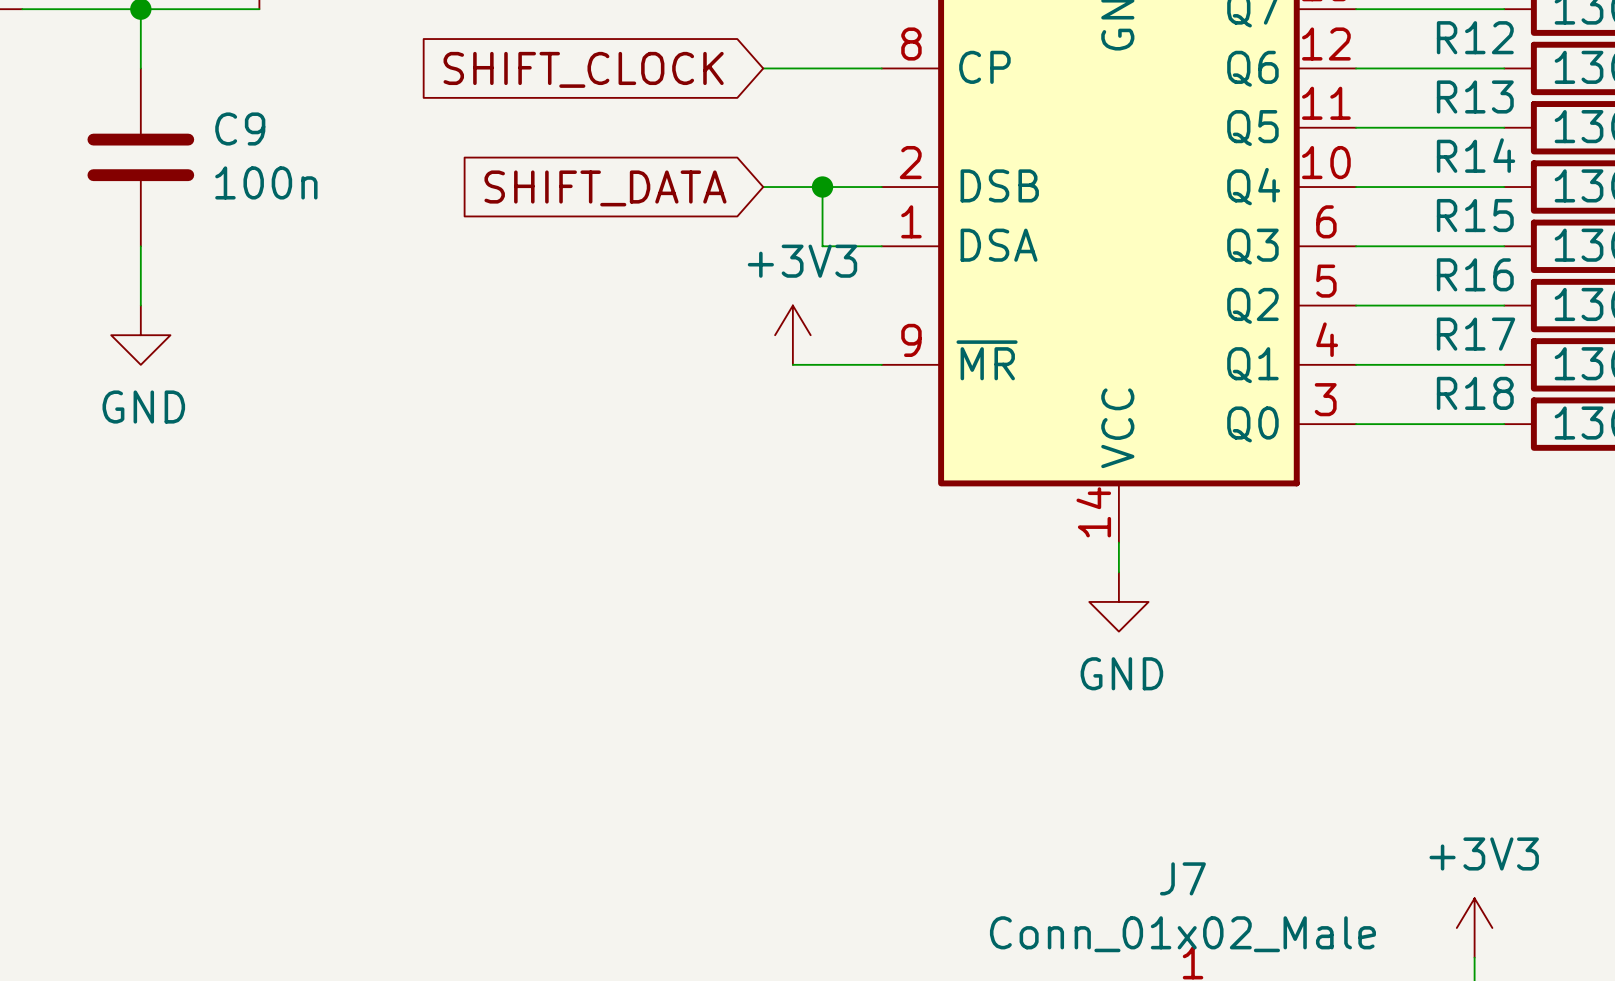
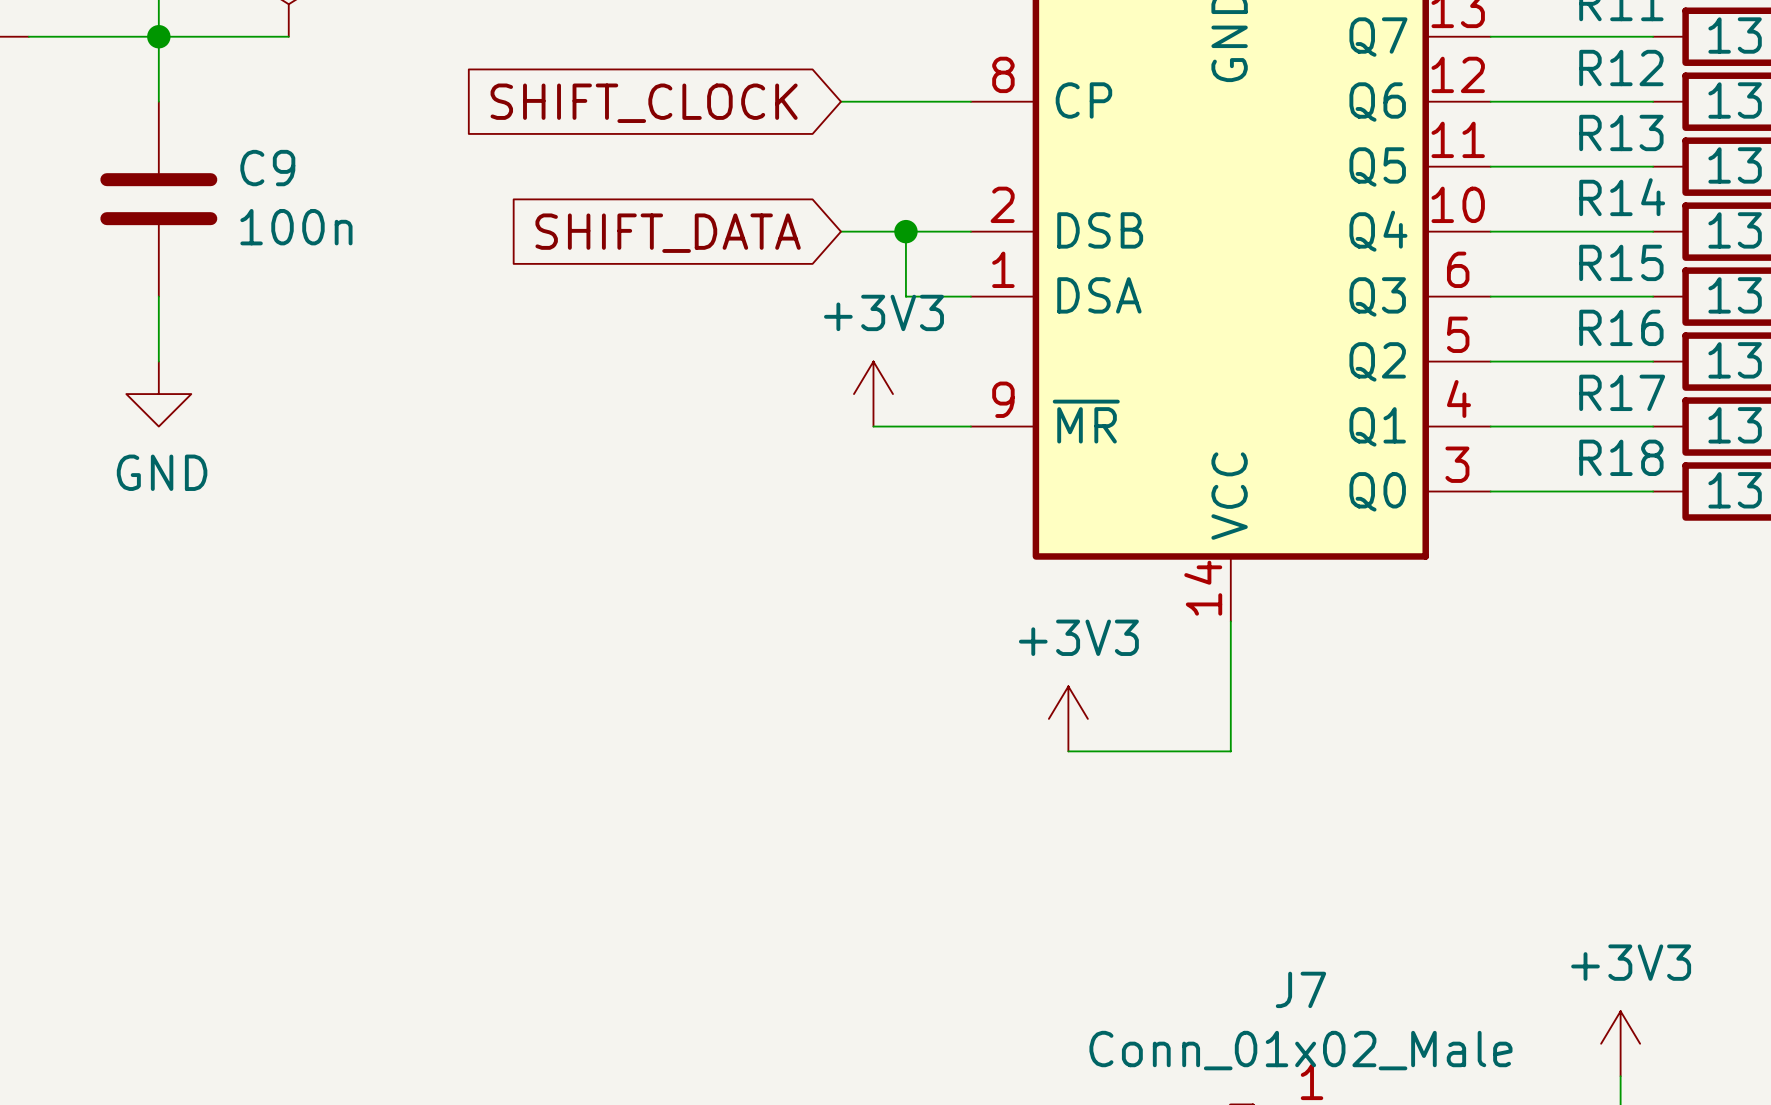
wire: none -> (1230, 653) (1230, 751) (1068, 751)
power symbol: GND (1118, 601) -> none
power symbol: none -> +3V3 (1068, 718)

